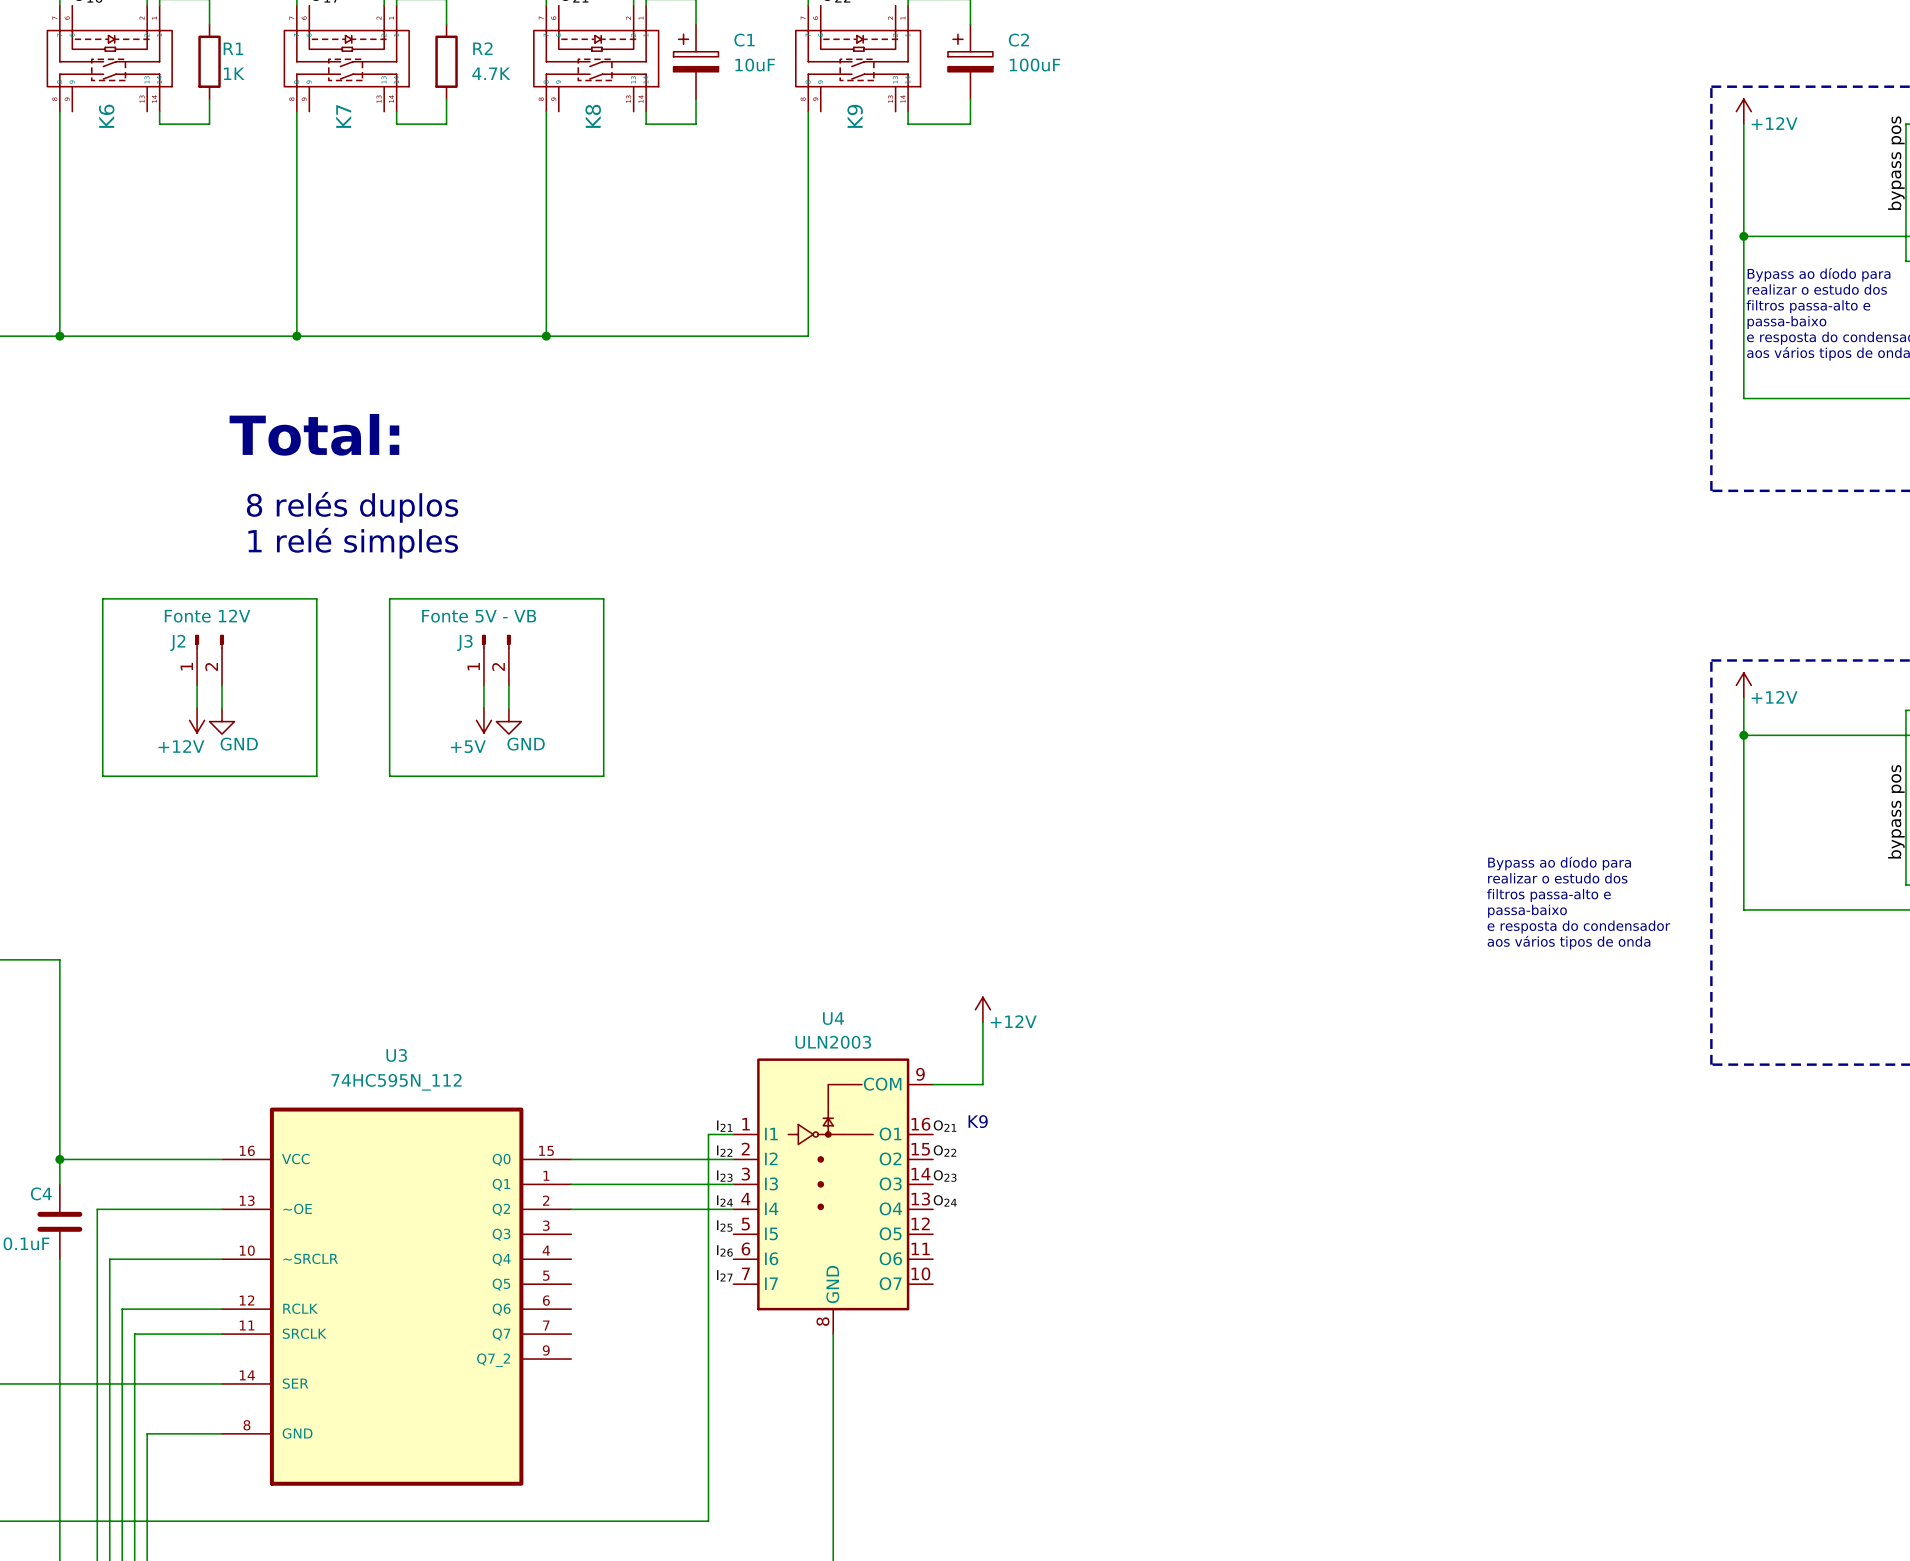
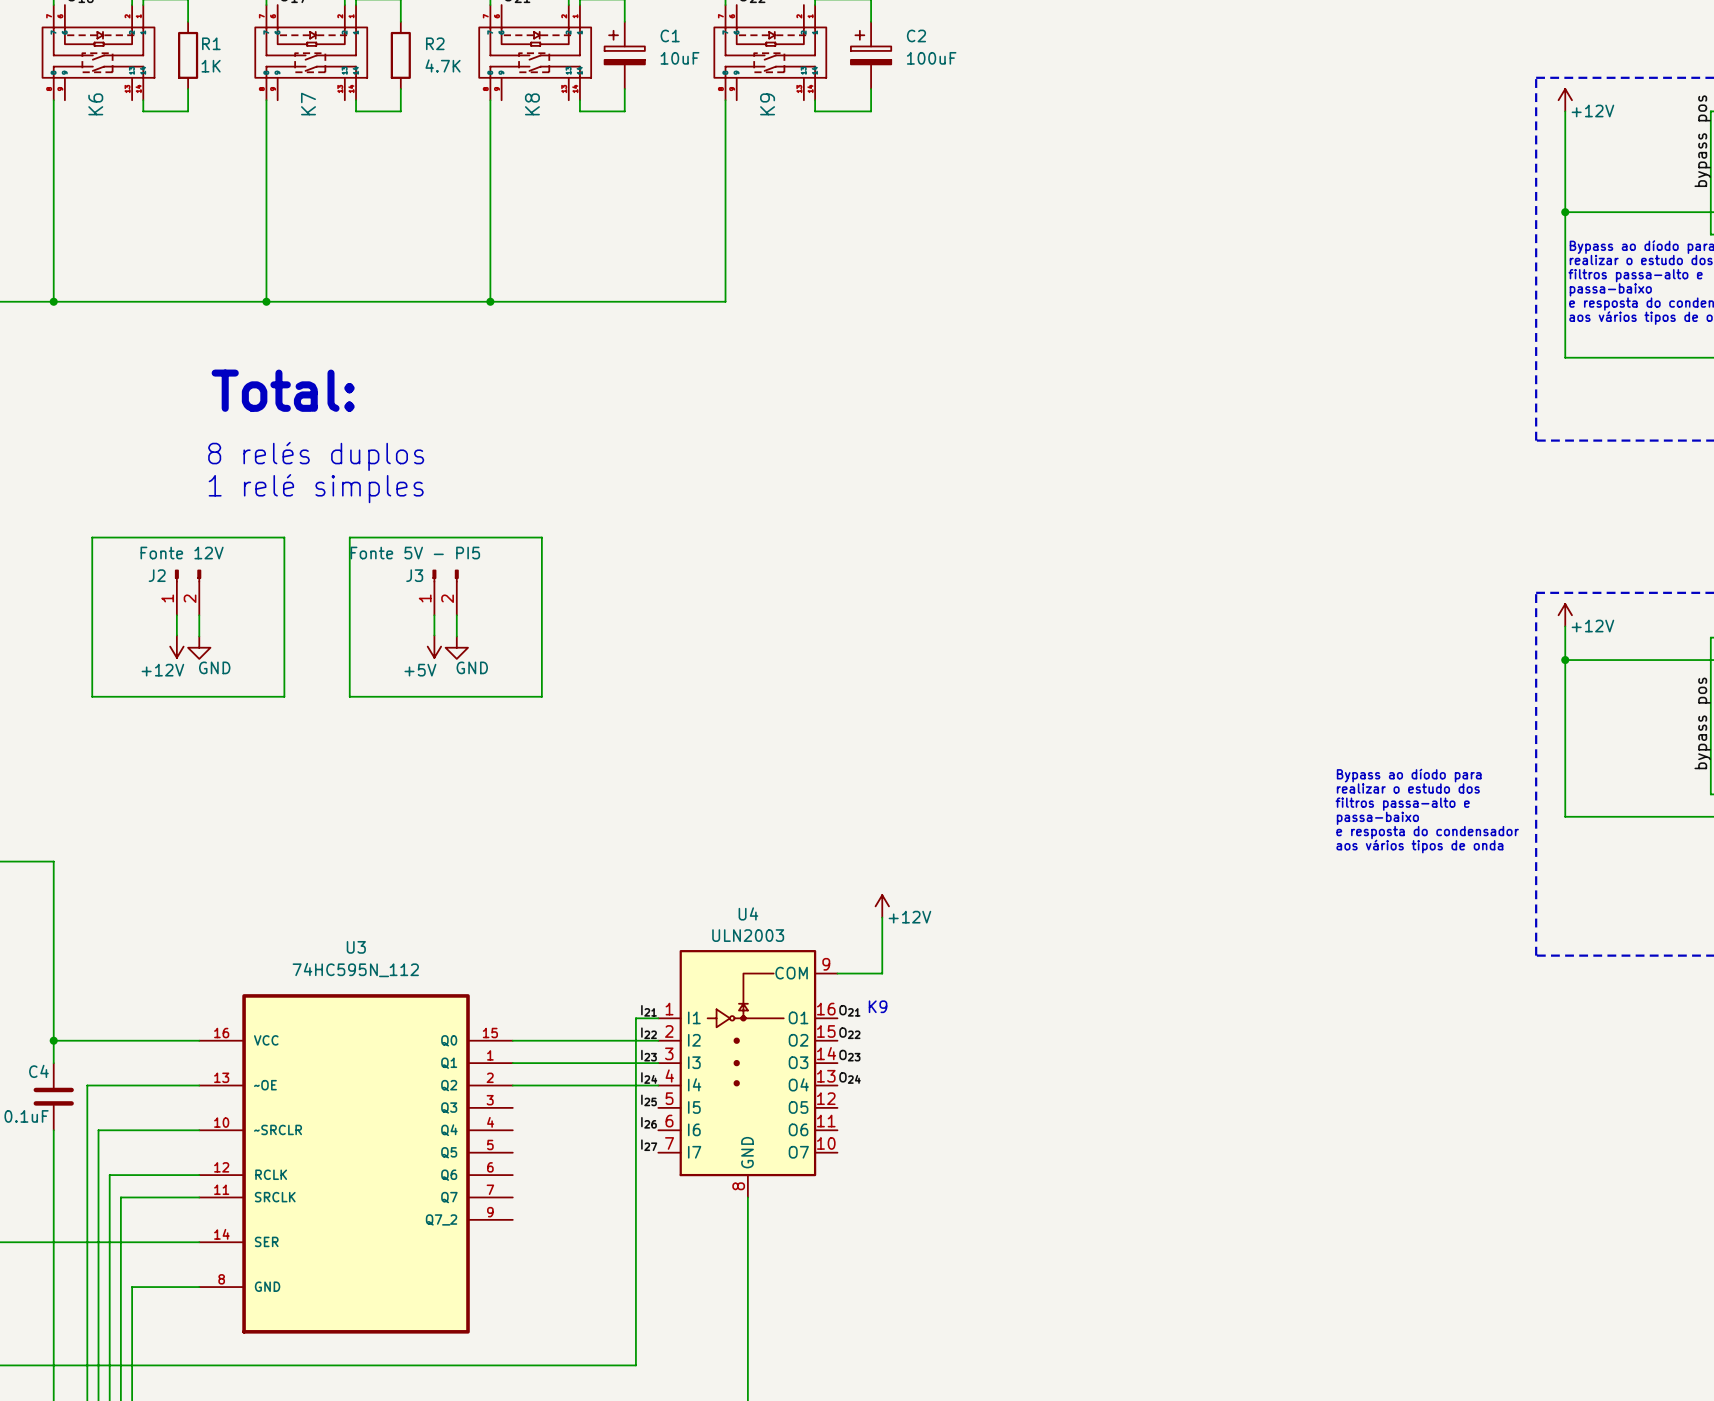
J3 value: Fonte 5V - VB (479, 616) -> Fonte 5V - PI5 (415, 553)

